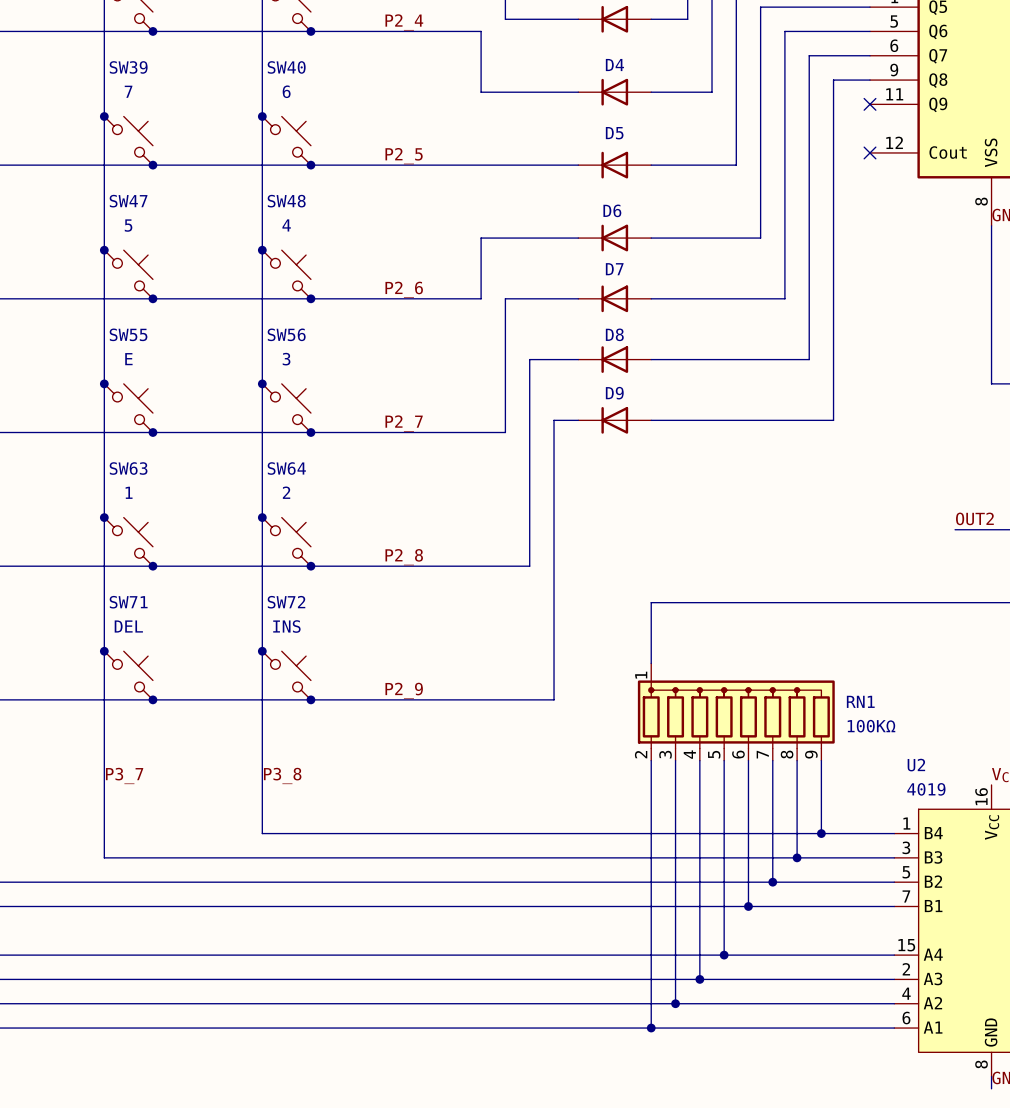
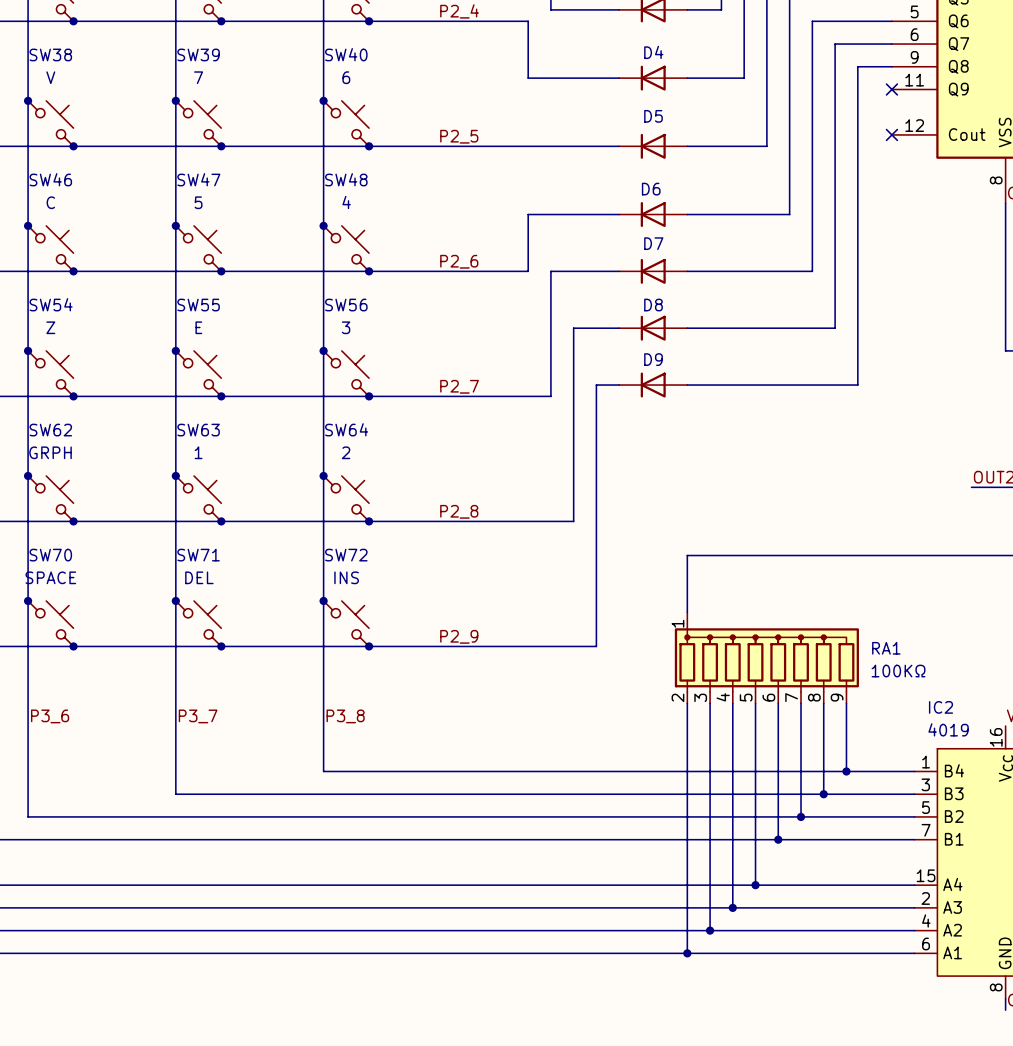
RN1 name: RN1 (860, 701) -> RA1 (886, 648)
U2 name: U2 (916, 765) -> IC2 (941, 707)

